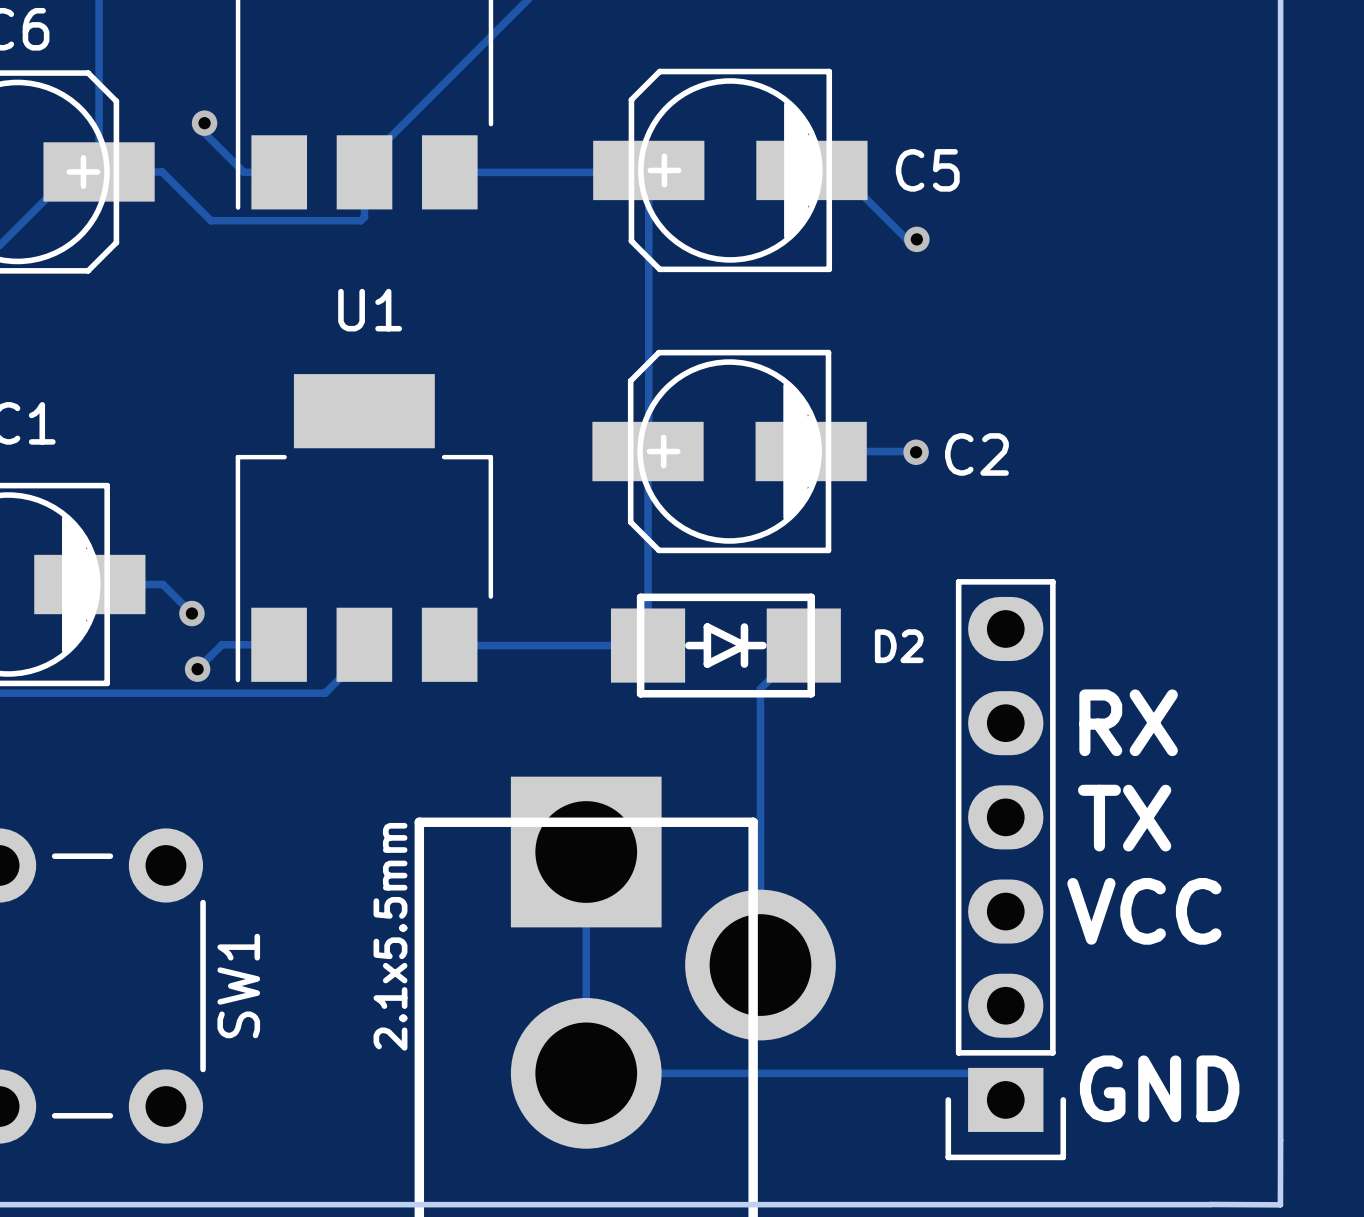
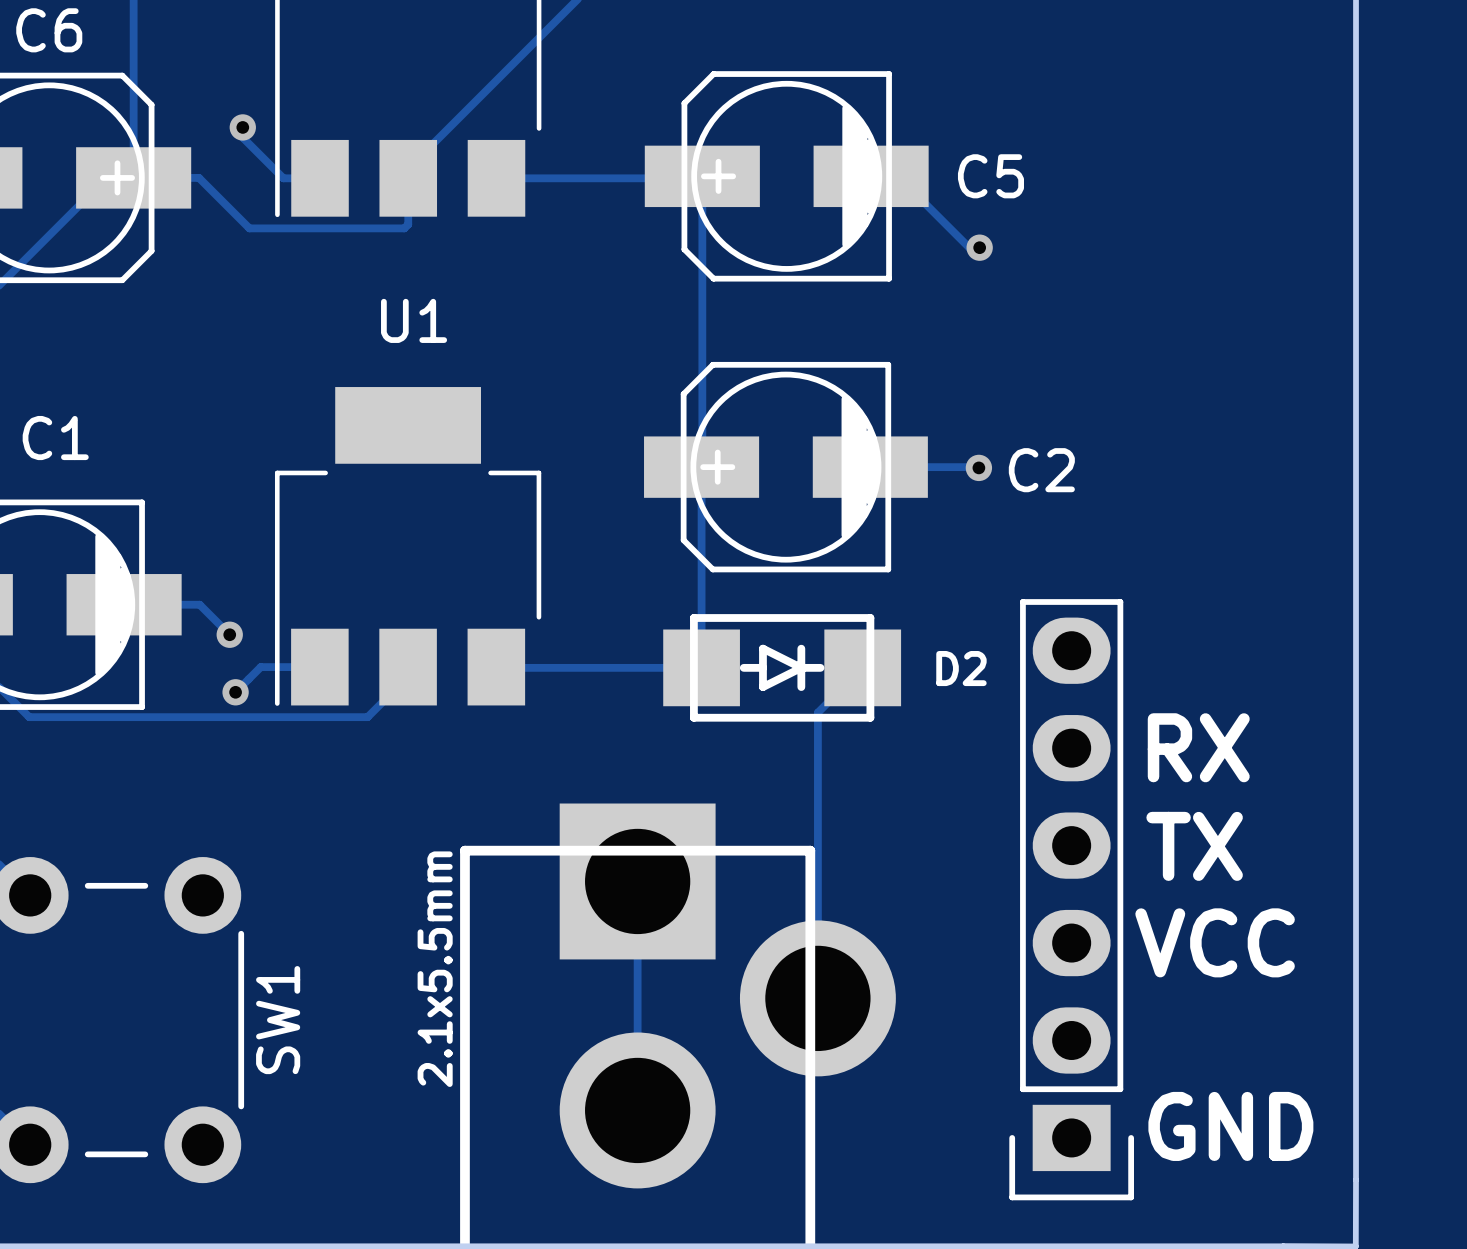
track: (586, 1073) (979, 1073) (1005, 1099) -> none

